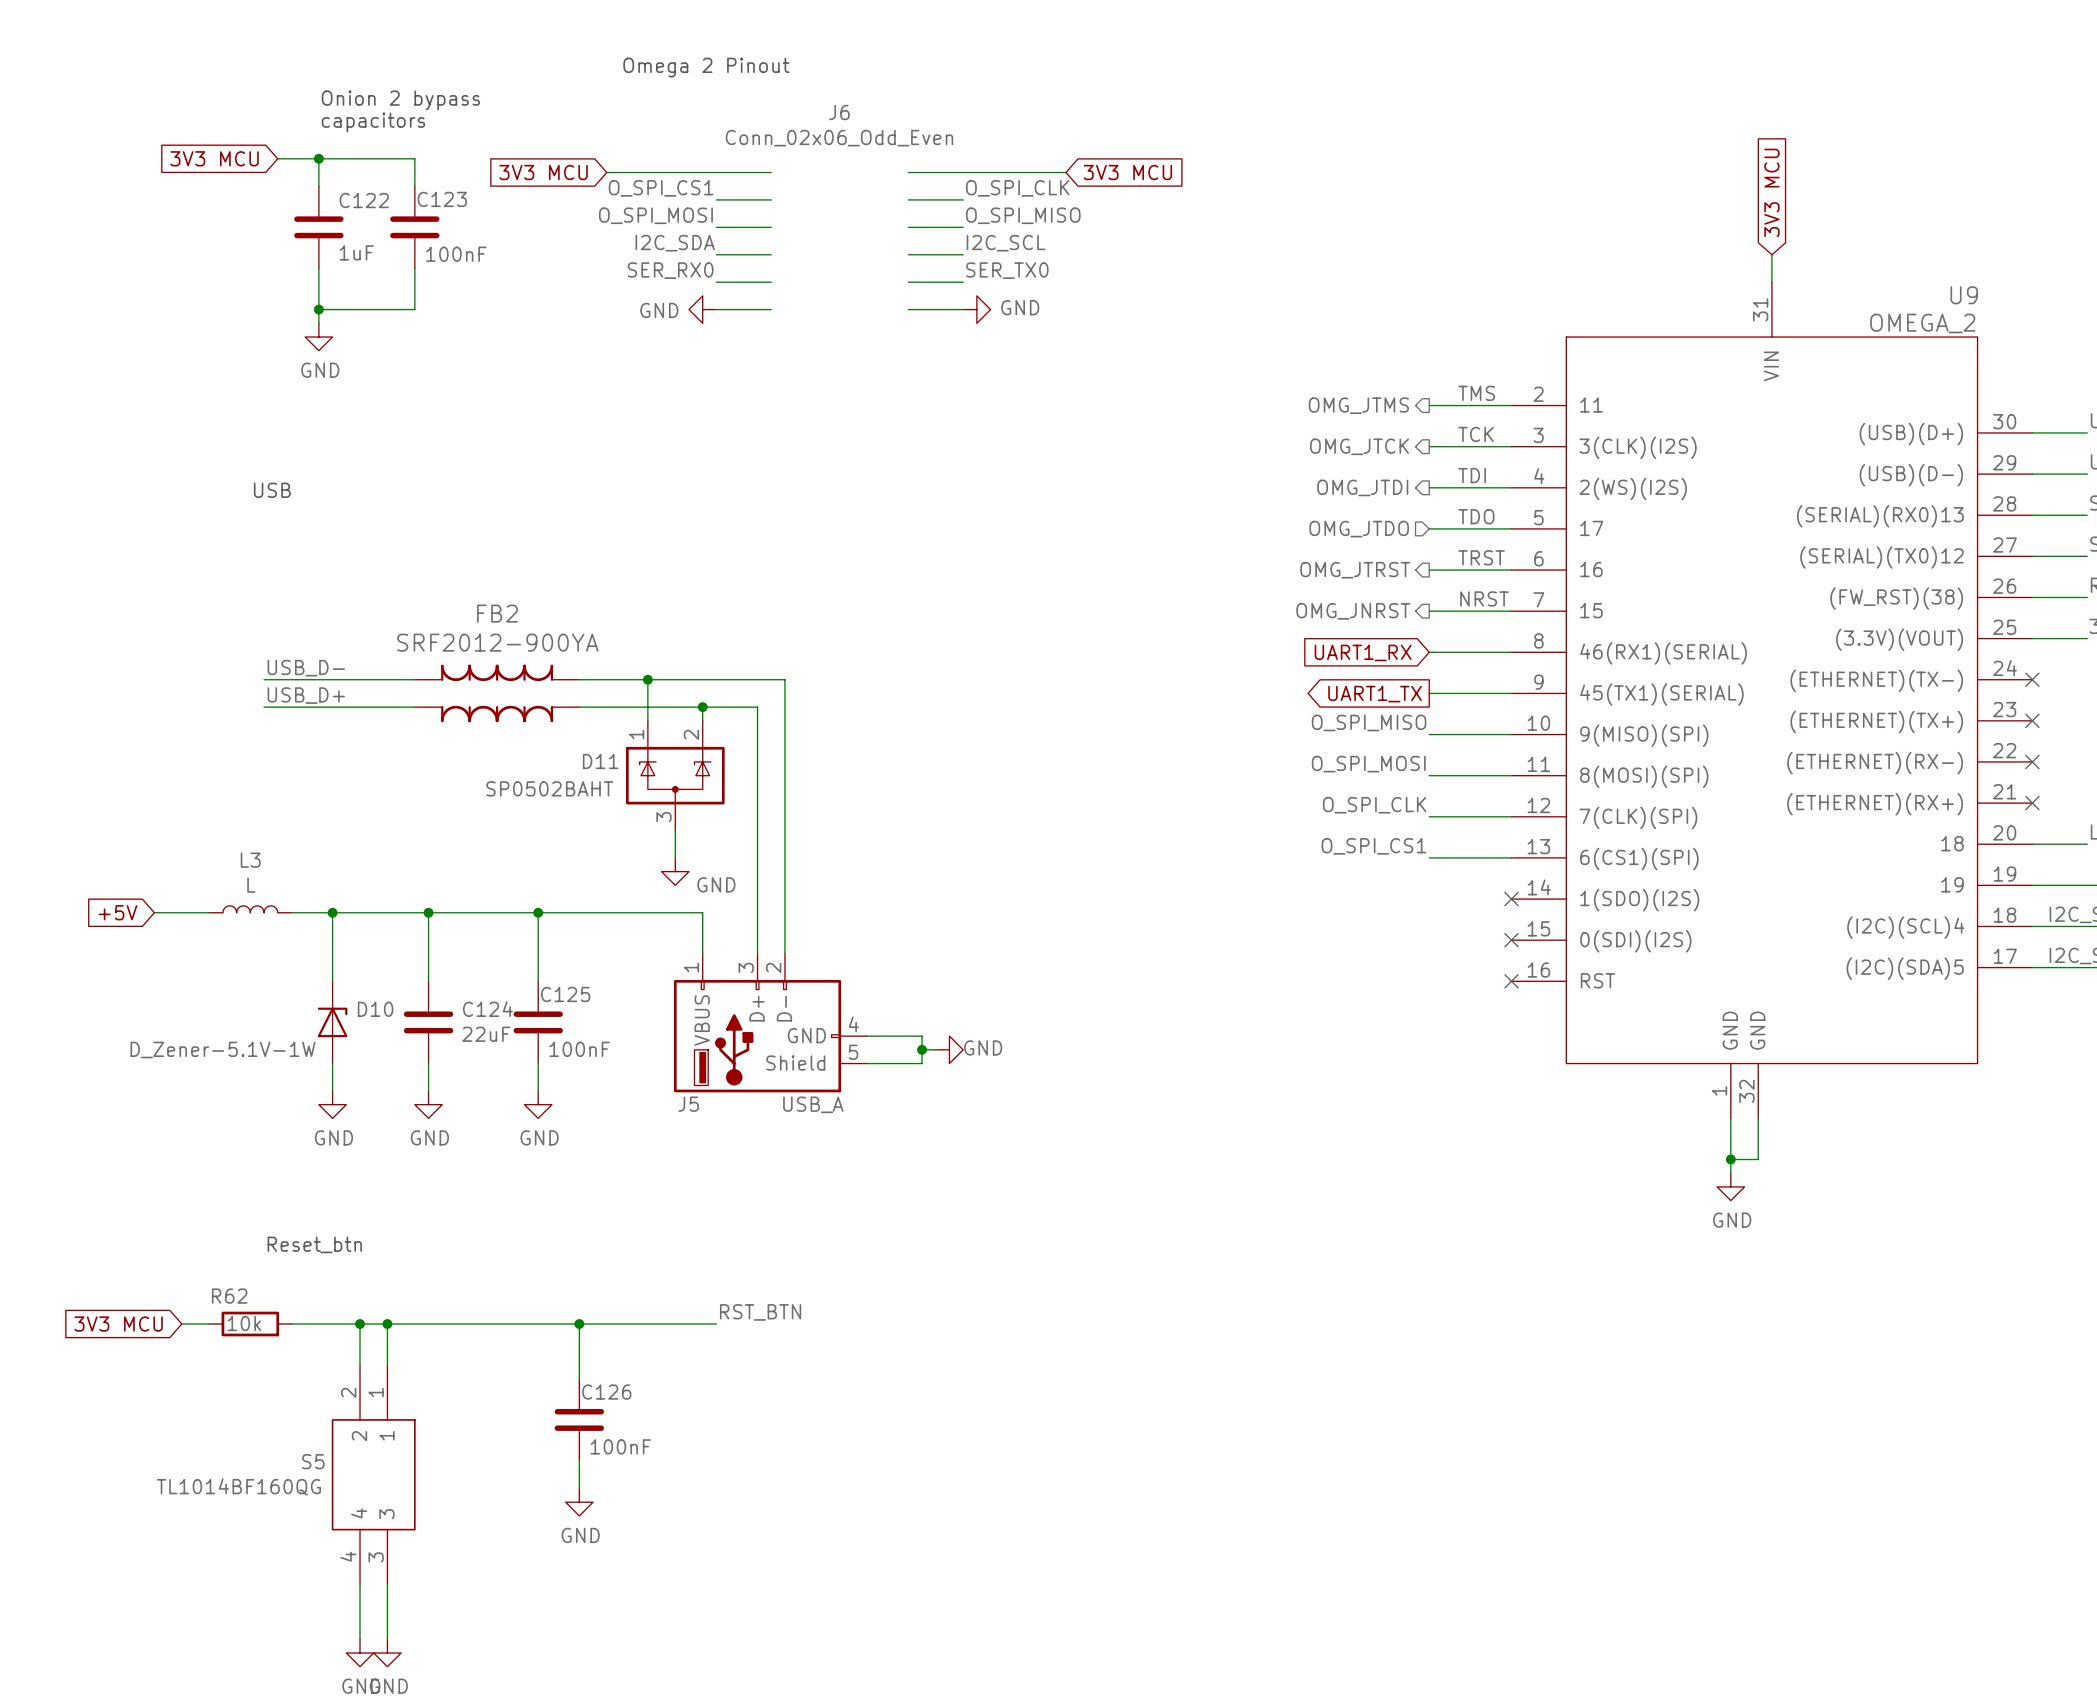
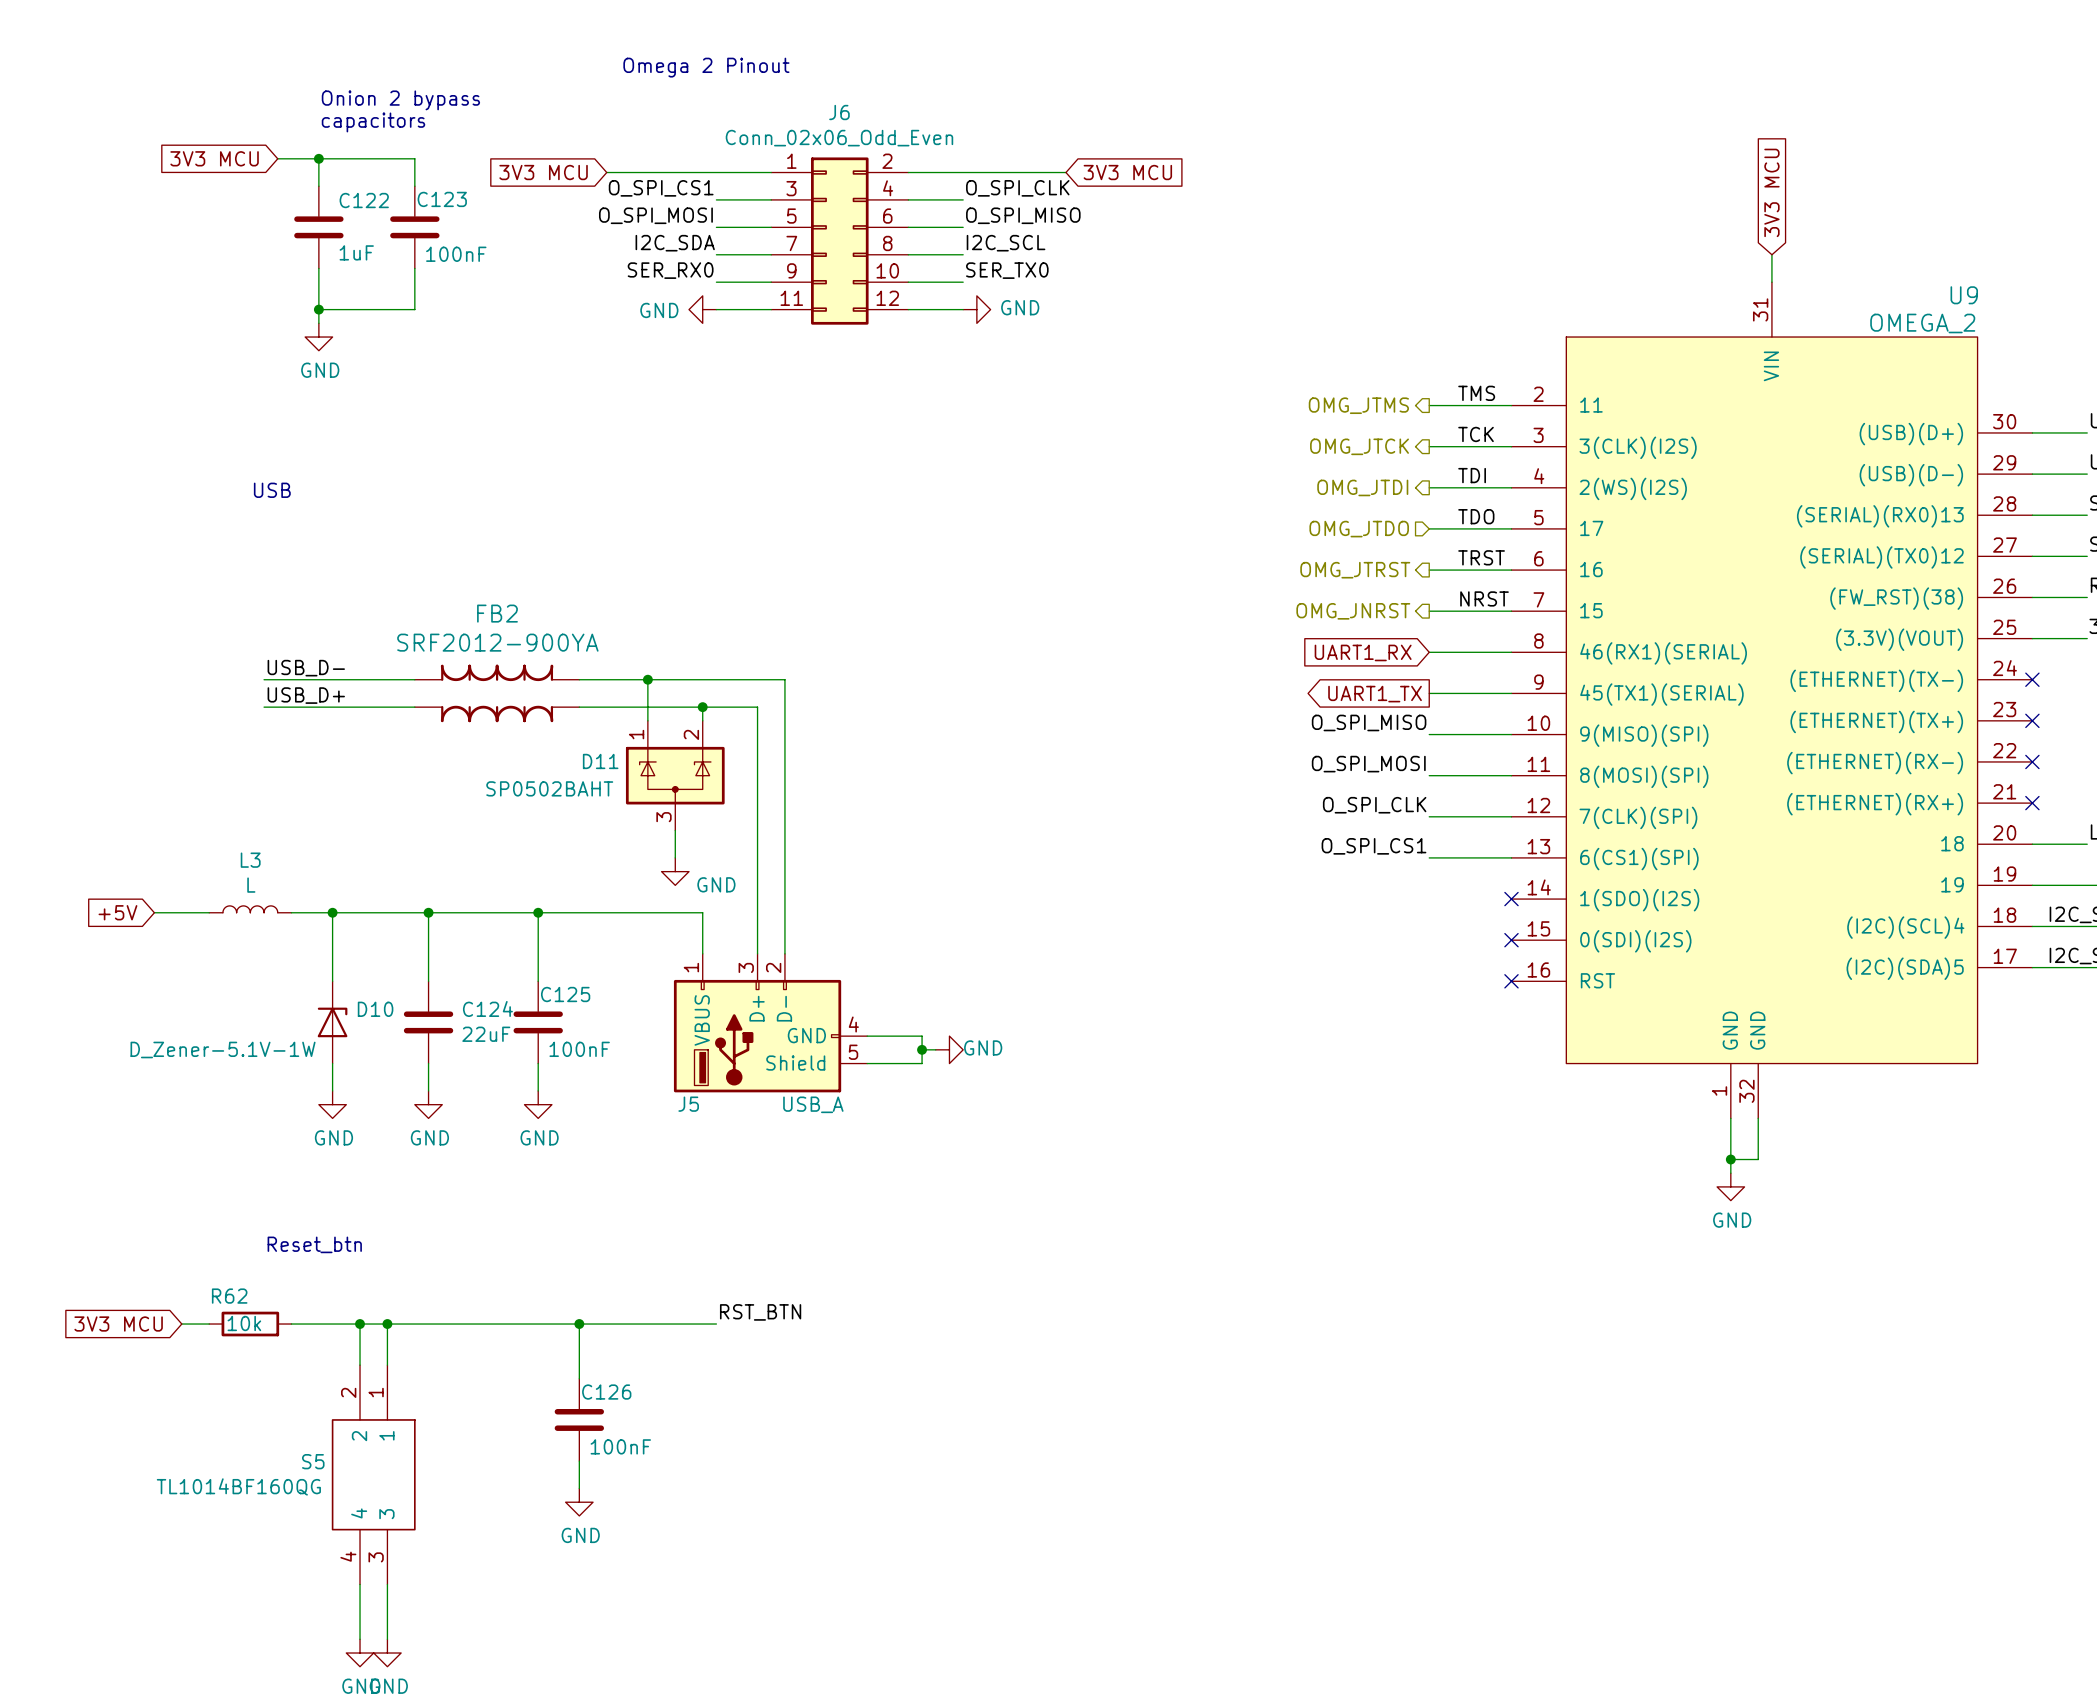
J6 symbol: [725, 104, 954, 147] -> [771, 157, 909, 325]

